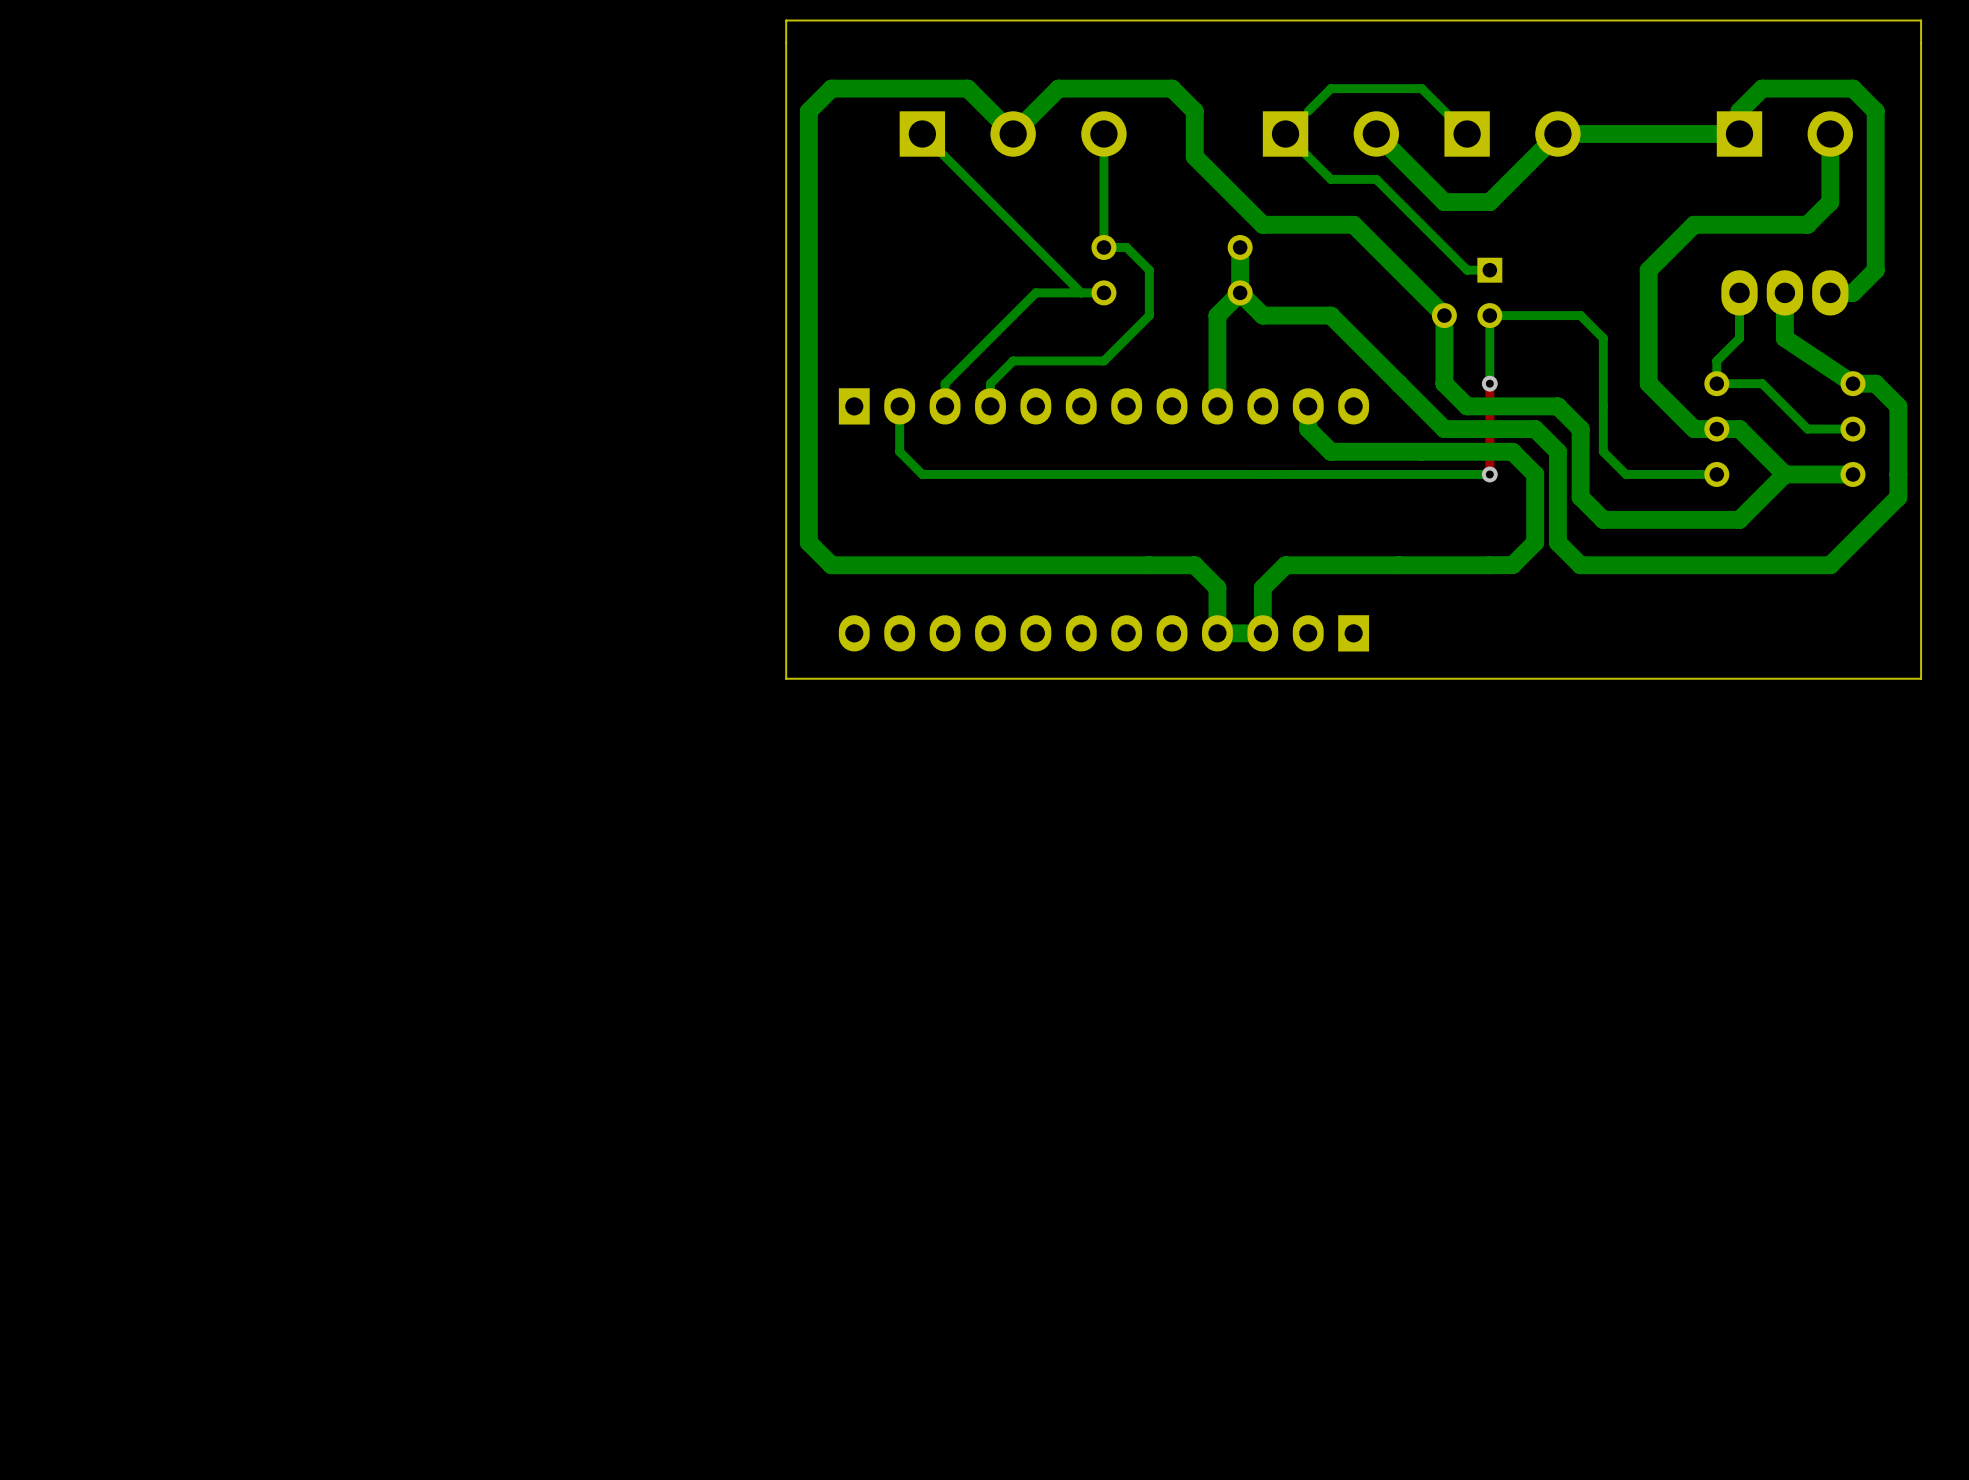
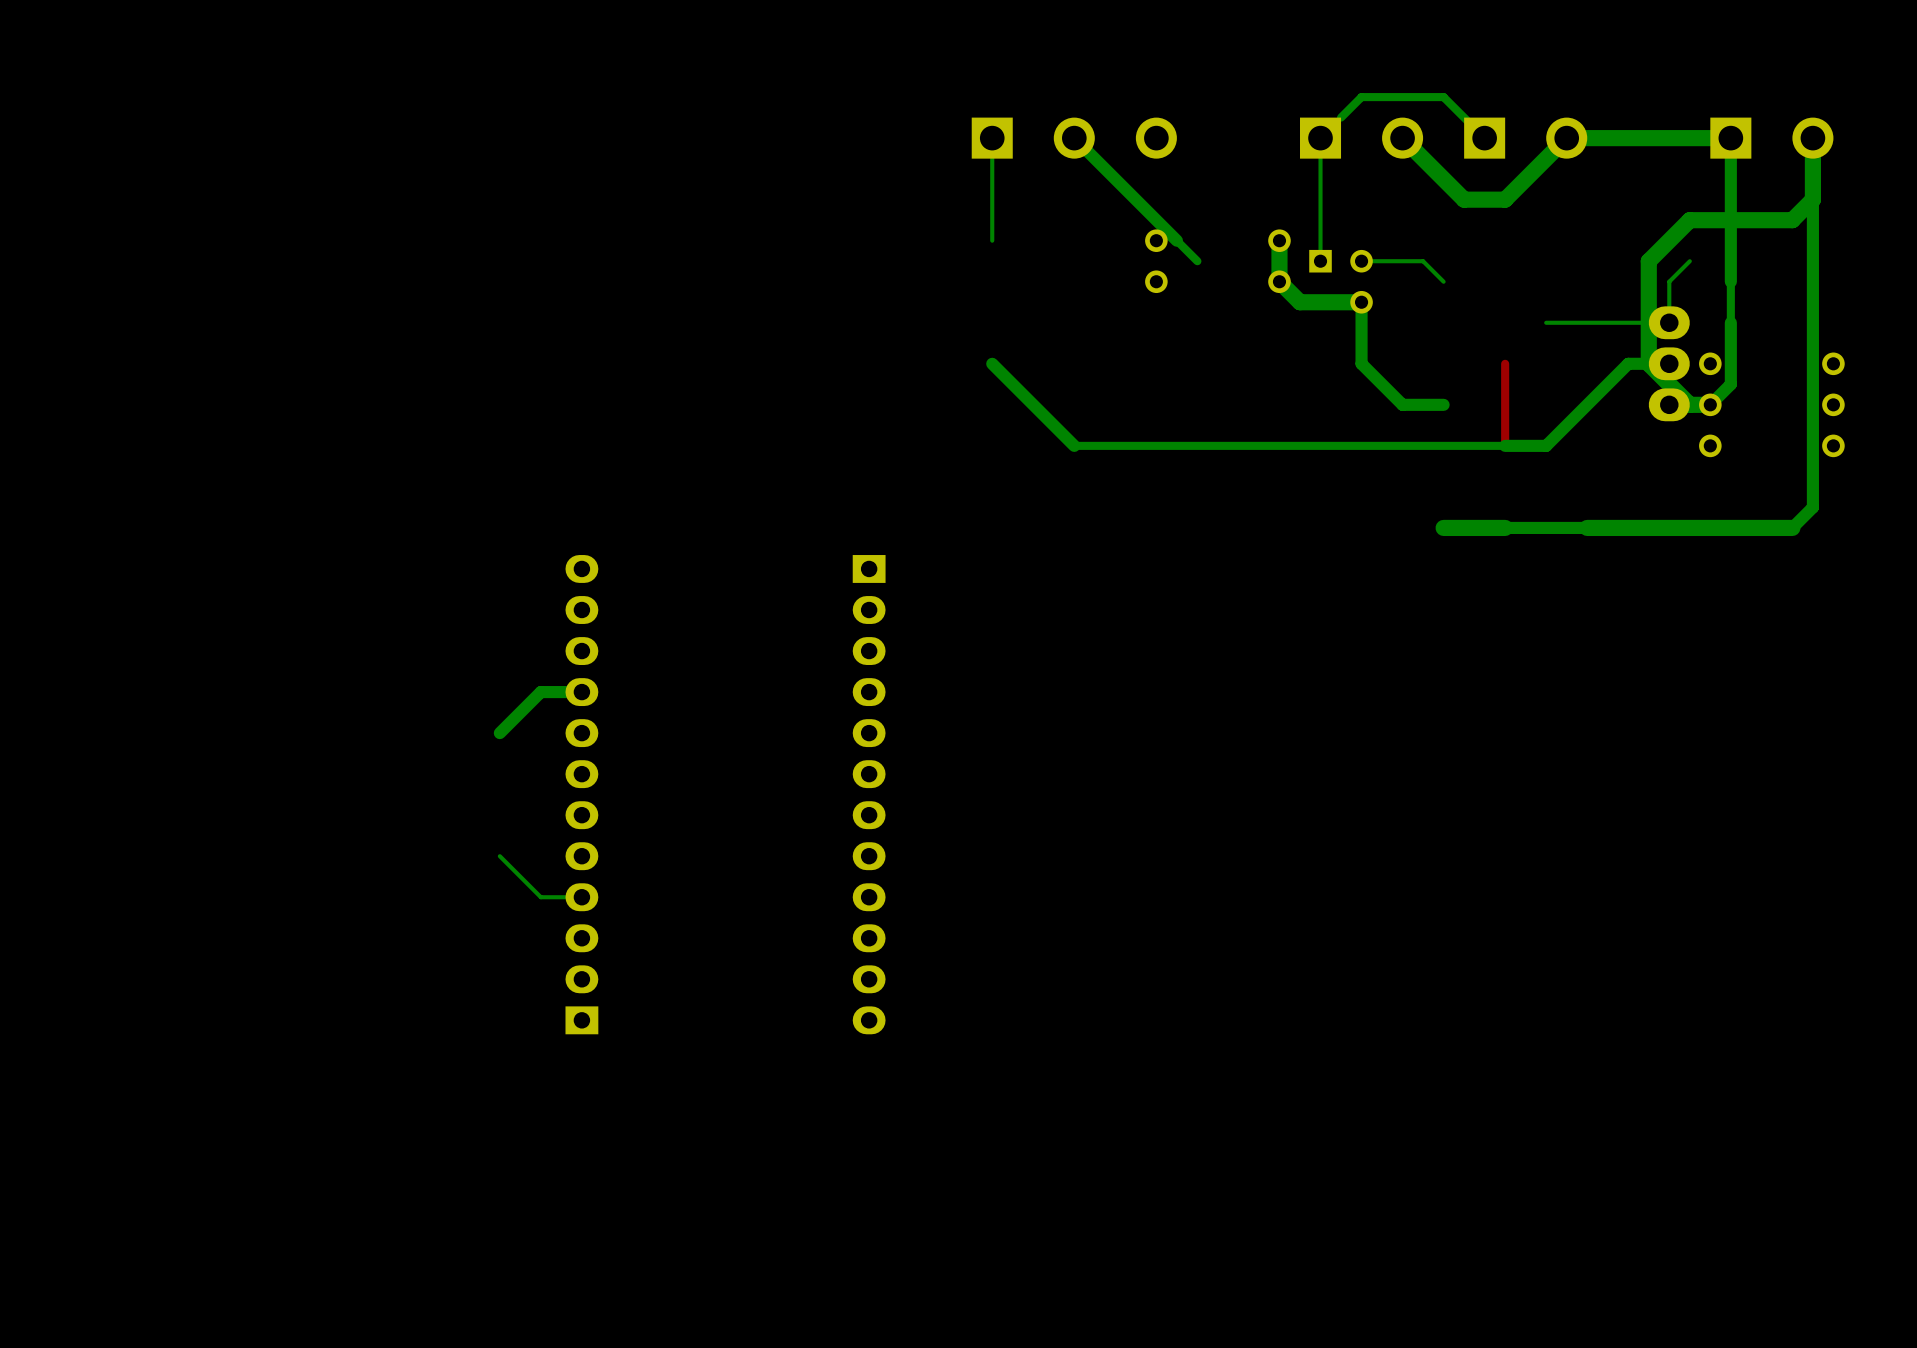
board edge: (1921, 20) (1921, 678) (786, 678) (786, 20) (1921, 20) -> none
bottom track: (922, 134) (1081, 292) -> (992, 138) (992, 240)
bottom track: (1103, 134) (1103, 247) (1126, 247) -> (1074, 138) (1176, 240)
bottom track: (1285, 134) (1330, 179) (1376, 179) (1467, 270) (1489, 270) -> (1320, 138) (1320, 261)
bottom track: (1739, 134) (1739, 111) (1762, 88) (1852, 88) (1875, 111) (1875, 270) (1852, 292) (1830, 292) -> (1730, 138) (1730, 281)
bottom track: (1149, 270) (1149, 315) (1103, 360) (1013, 360) (990, 383) (990, 406) -> none
bottom track: (1399, 270) (1353, 224) (1262, 224) (1194, 156) (1194, 111) (1172, 88) (1058, 88) (1013, 134) (967, 88) (831, 88) (808, 111) (808, 542) (831, 565) (1194, 565) (1217, 587) (1217, 633) (1262, 633) (1262, 587) (1285, 565) (1421, 565) -> (1423, 261) (1361, 261)
bottom track width: thick (1399, 270) (1421, 292) -> thin (1423, 261) (1443, 281)
bottom track: none -> (1689, 261) (1669, 281) (1669, 322) (1546, 322)
bottom track: (1103, 292) (1035, 292) (945, 383) (945, 406) -> none
bottom track: (1240, 292) (1217, 315) (1217, 406) -> none
bottom track: (1421, 292) (1444, 315) (1444, 383) (1467, 406) (1557, 406) (1580, 429) (1580, 497) (1603, 519) (1739, 519) (1784, 474) -> none
part rotation: 0° (1467, 292) -> 90° counterclockwise (1341, 281)
part position: (1467, 292) -> (1341, 281)
bottom track: (1784, 292) (1784, 338) (1852, 383) (1875, 383) (1898, 406) (1898, 497) (1830, 565) (1807, 565) -> (1812, 199) (1812, 507) (1792, 527)
part rotation: 0° (1784, 292) -> 90° clockwise (1669, 363)
part position: (1784, 292) -> (1669, 363)
bottom track: (1330, 315) (1444, 429) (1535, 429) (1557, 451) (1557, 542) (1580, 565) -> (1361, 302) (1361, 363) (1402, 404) (1443, 404)
bottom track: (1739, 338) (1716, 360) (1716, 383) (1762, 383) (1807, 429) (1852, 429) -> (1730, 322) (1730, 384) (1710, 404)
bottom track: (1489, 383) (1489, 315) (1580, 315) (1603, 338) (1603, 451) (1626, 474) (1716, 474) -> none
via: (1489, 383) -> none
bottom track: none -> (1669, 363) (1628, 363) (1546, 445) (1505, 445)
bottom track: (899, 406) (899, 451) (922, 474) (1013, 474) -> (992, 363) (1074, 445)
part: (1103, 406) -> none
bottom track: (1308, 406) (1308, 429) (1330, 451) (1512, 451) (1535, 474) (1535, 542) (1512, 564) (1489, 565) -> (1587, 527) (1505, 527)
bottom track: (1716, 429) (1739, 429) (1784, 474) -> none
via: (1489, 474) -> none
bottom track: (1852, 474) (1784, 474) -> none
part: (1103, 633) -> none
bottom track: none -> (581, 692) (540, 692) (499, 733)
part: none -> (581, 794)
part: none -> (869, 794)
bottom track: none -> (499, 856) (540, 897) (581, 897)

